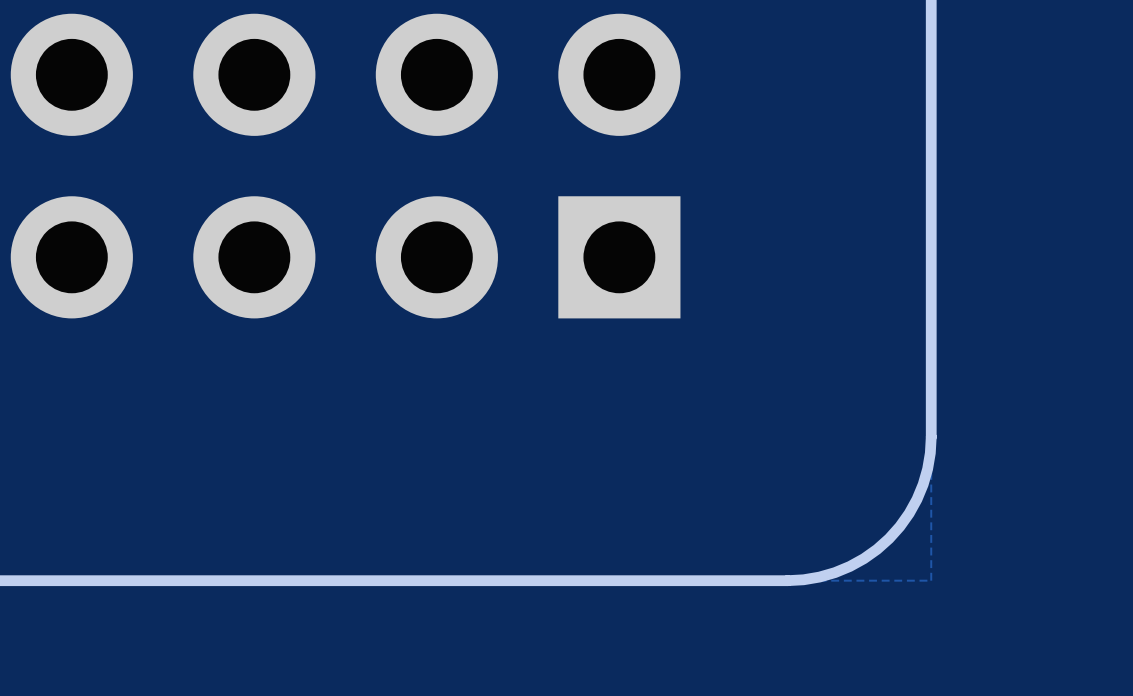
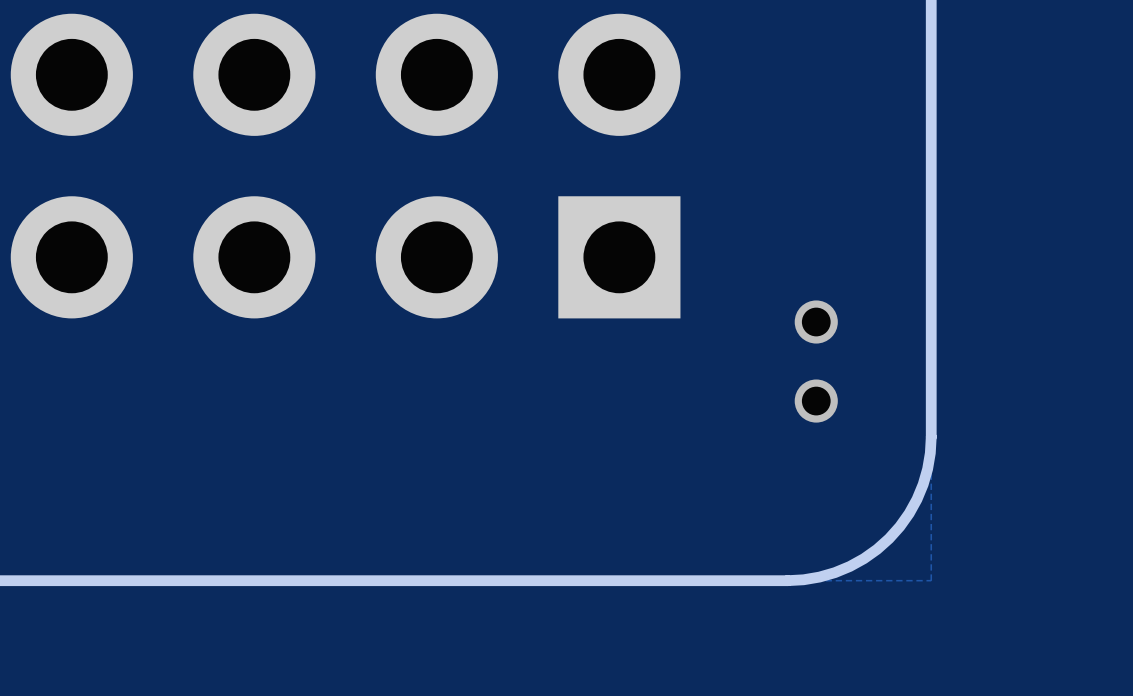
via: none -> (816, 322)
via: none -> (816, 401)

